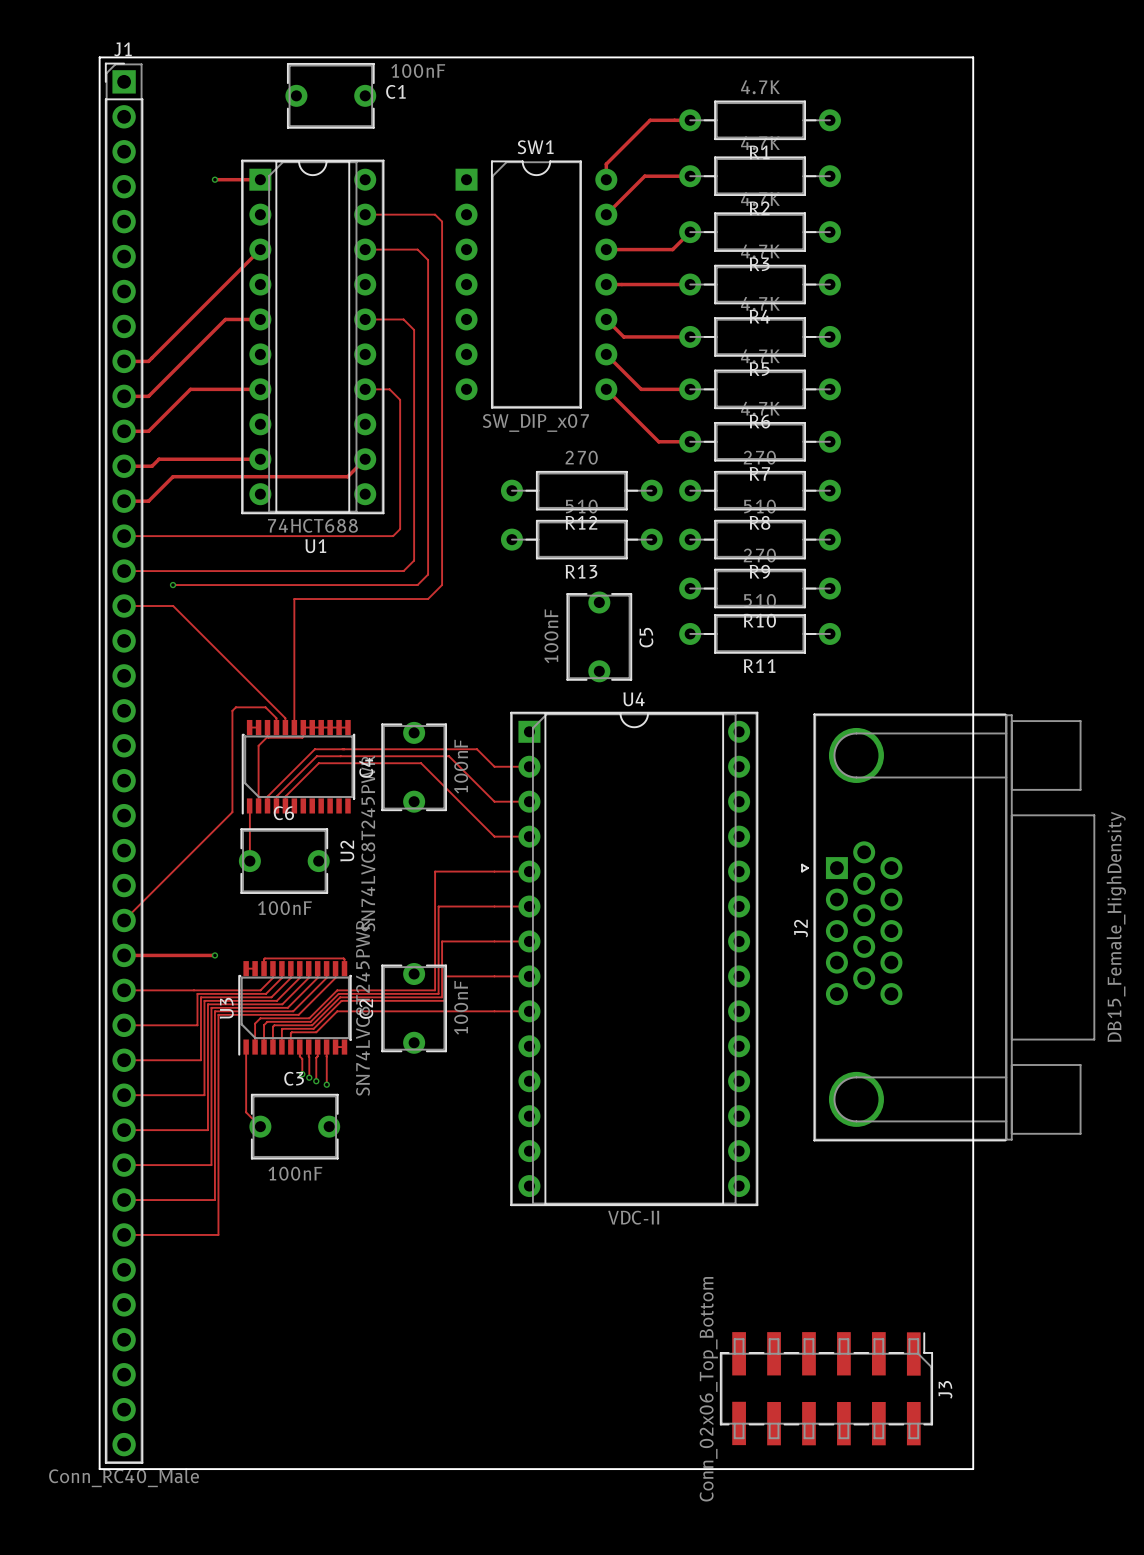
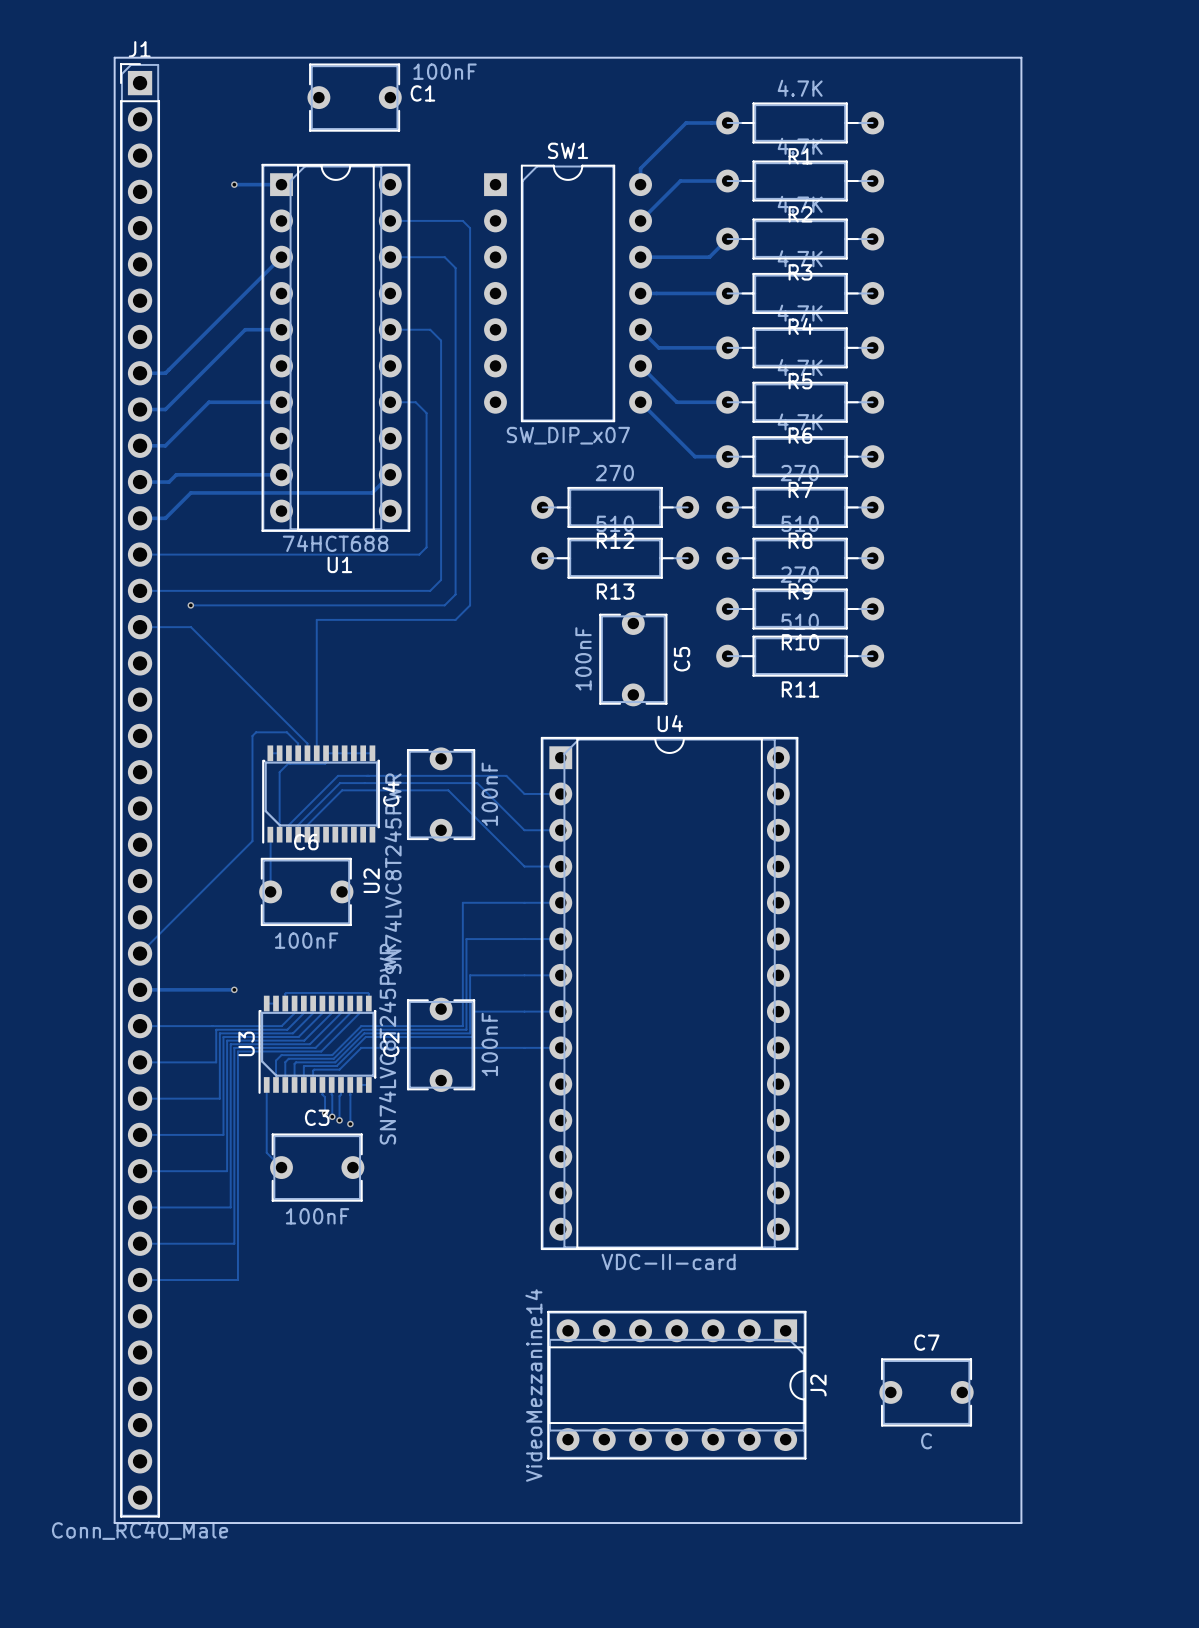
J2 footprint: [801, 713, 1096, 1142] -> [547, 1310, 807, 1460]
J2 value: DB15_Female_HighDensity (1116, 926) -> VideoMezzanine14 (533, 1385)
J2 name position: J2 (801, 928) -> J2 (818, 1385)
U4 value: VDC-II (633, 1217) -> VDC-II-card (668, 1261)
C7: none -> C (926, 1392)
J3: Conn_02x06_Top_Bottom (826, 1388) -> none

